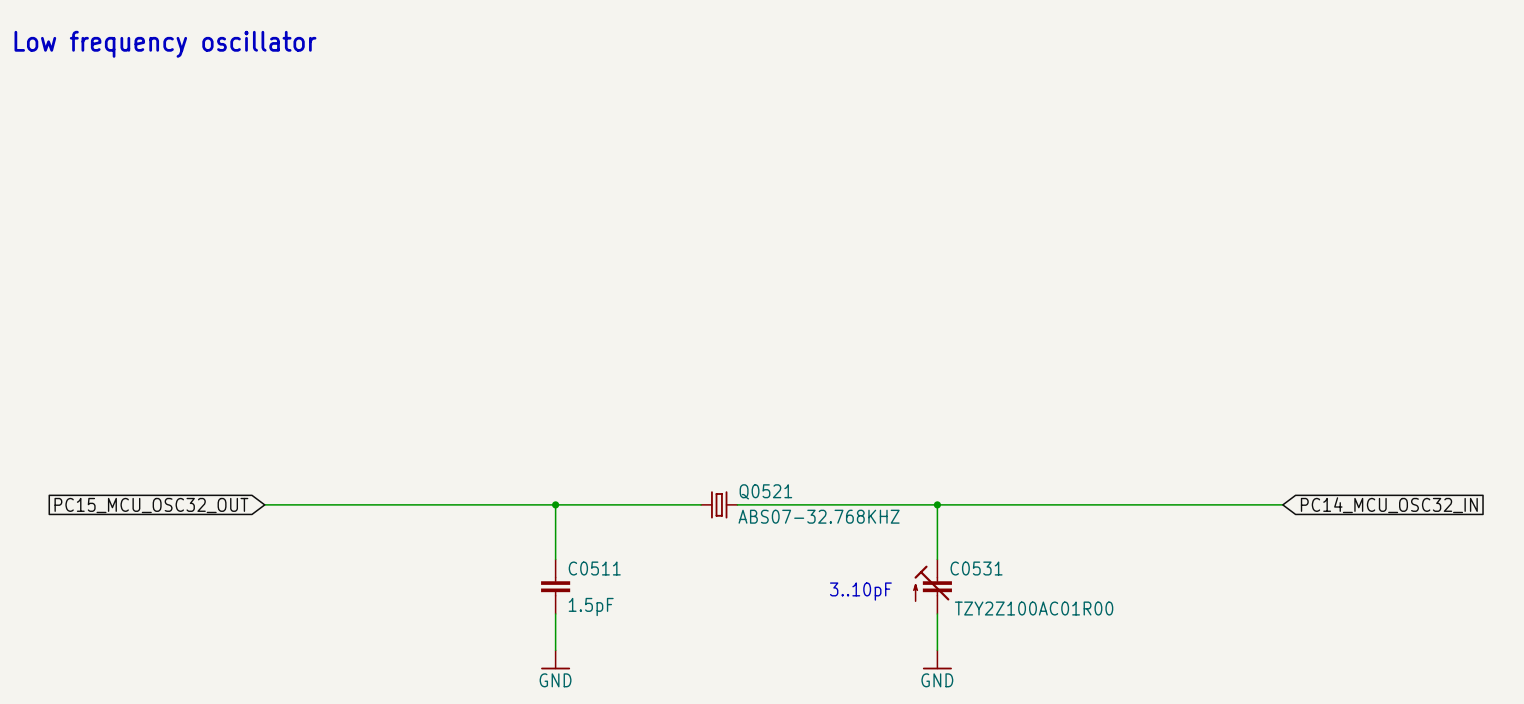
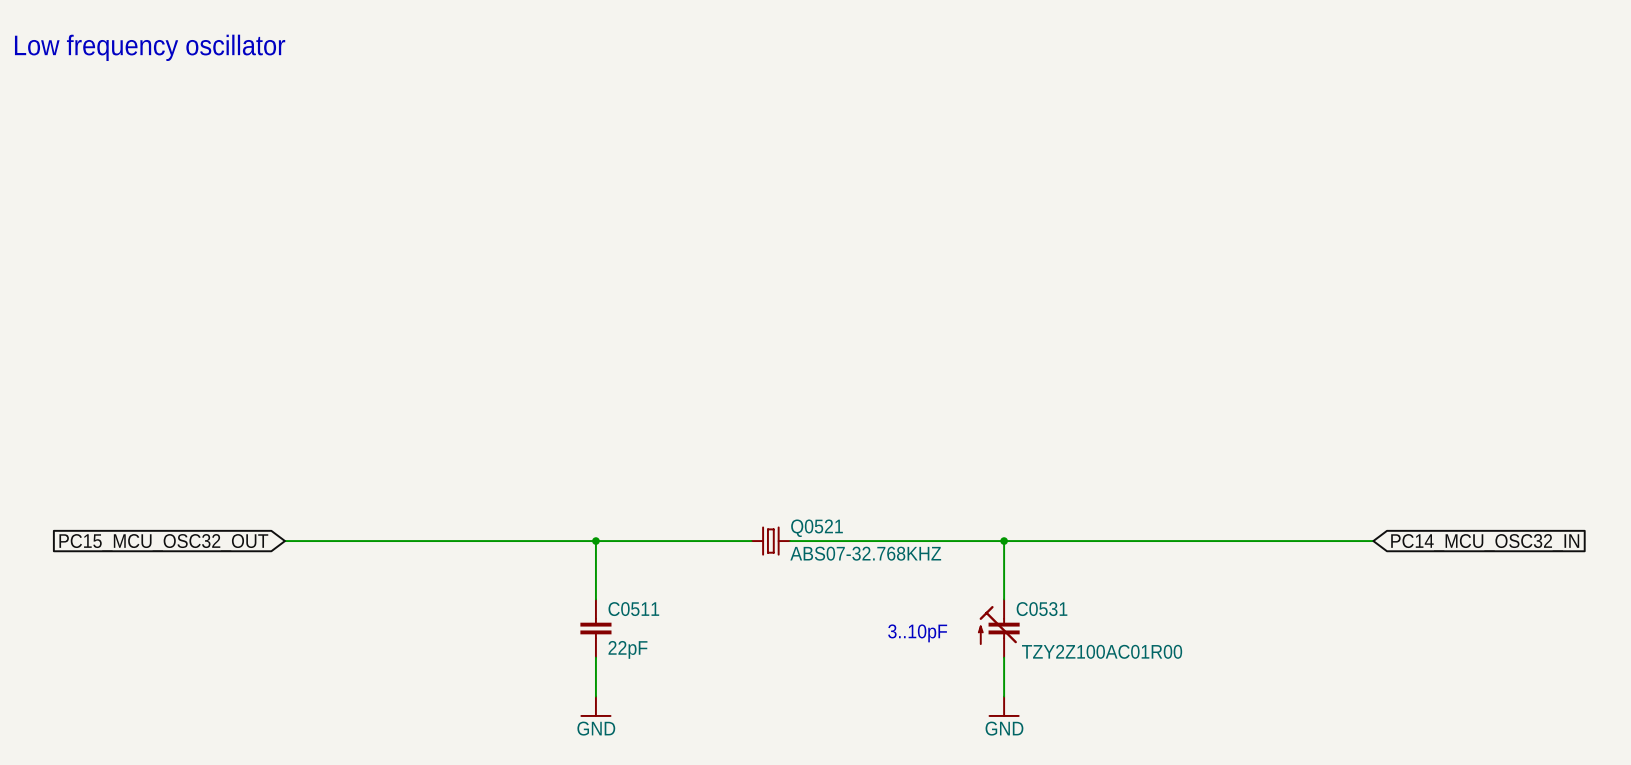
C0511 value: 1.5pF (591, 607) -> 22pF (627, 649)

